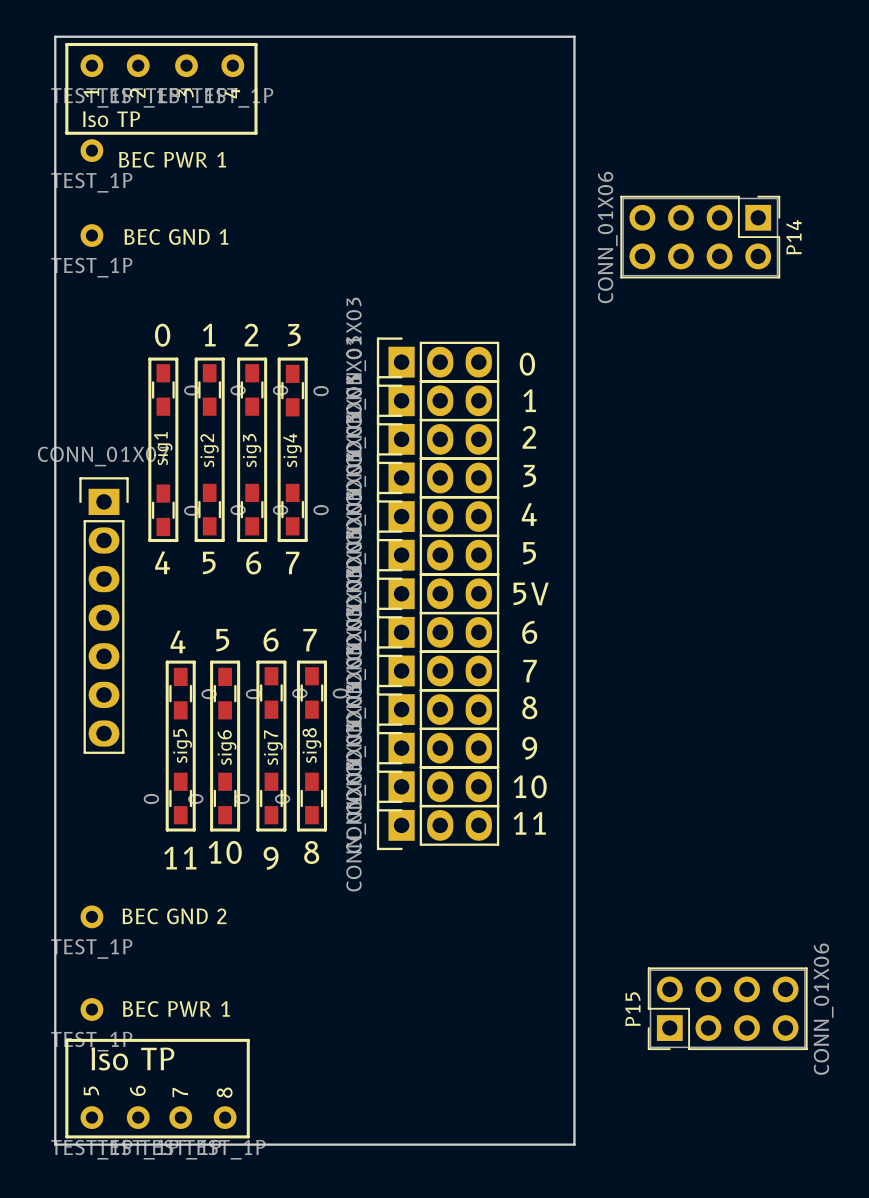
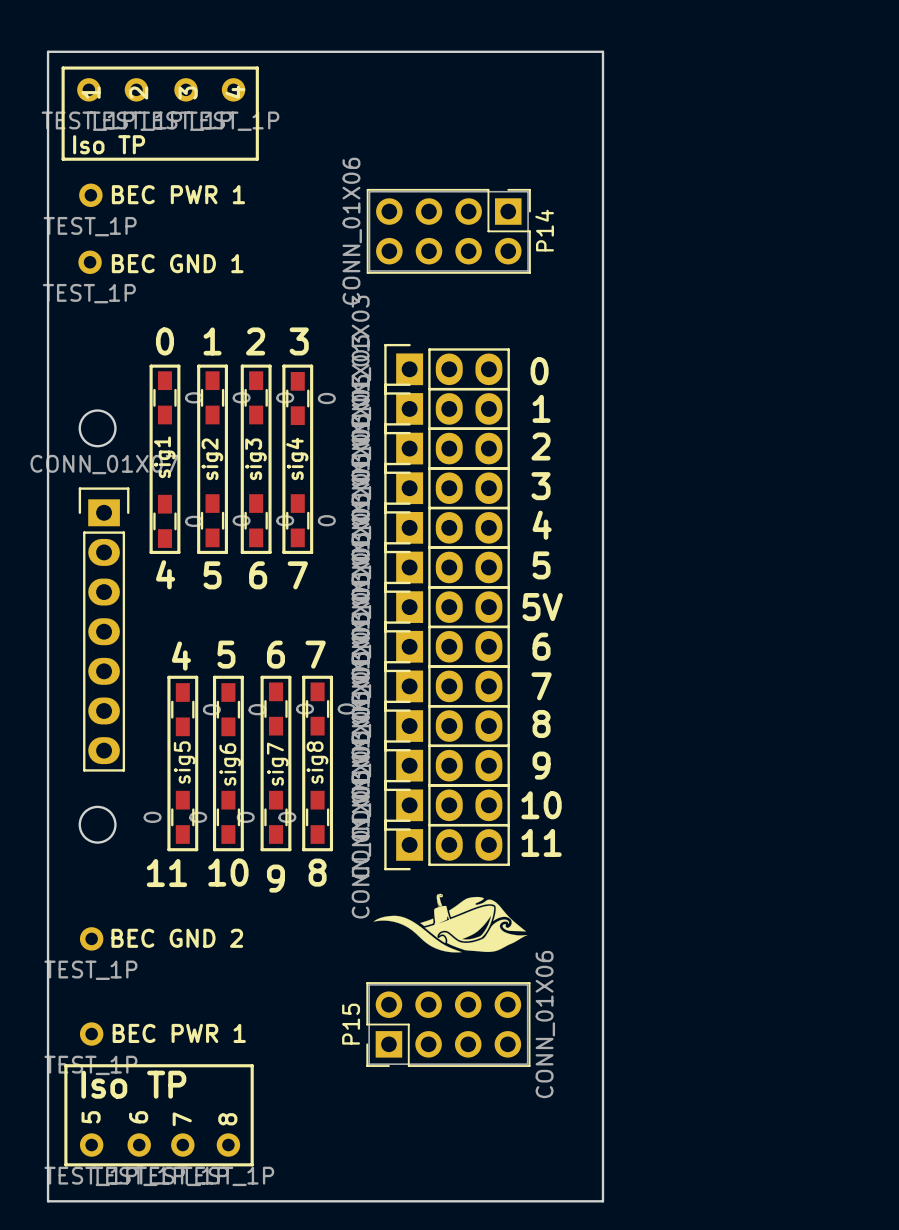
board edge: (55, 36) (574, 36) (574, 1144) (55, 1144) (55, 36) -> (48, 51) (48, 1201) (602, 1201) (602, 51) (48, 51)
line: (66, 44) (66, 133) (255, 133) (255, 44) (66, 44) -> (63, 68) (63, 159) (257, 159) (257, 68) (63, 68)
part position: (91, 65) -> (88, 89)
part position: (138, 65) -> (136, 89)
part position: (186, 65) -> (186, 89)
part position: (232, 65) -> (233, 89)
text position: Iso TP (111, 119) -> Iso TP (109, 144)
part: TEST_1P (91, 150) -> none
text position: BEC PWR 1 (172, 159) -> BEC PWR 1 (178, 194)
part: none -> TEST_1P (90, 195)
part: TEST_1P (91, 235) -> none
text position: BEC GND 1 (176, 236) -> BEC GND 1 (177, 263)
P14 position: (700, 237) -> (448, 231)
part: none -> TEST_1P (90, 262)
round board edge: none -> [78, 409, 117, 448]
round board edge: none -> [78, 805, 117, 844]
text position: 11 (180, 858) -> 11 (166, 873)
drawing: none -> [373, 893, 528, 953]
P15 position: (727, 1008) -> (448, 1024)

